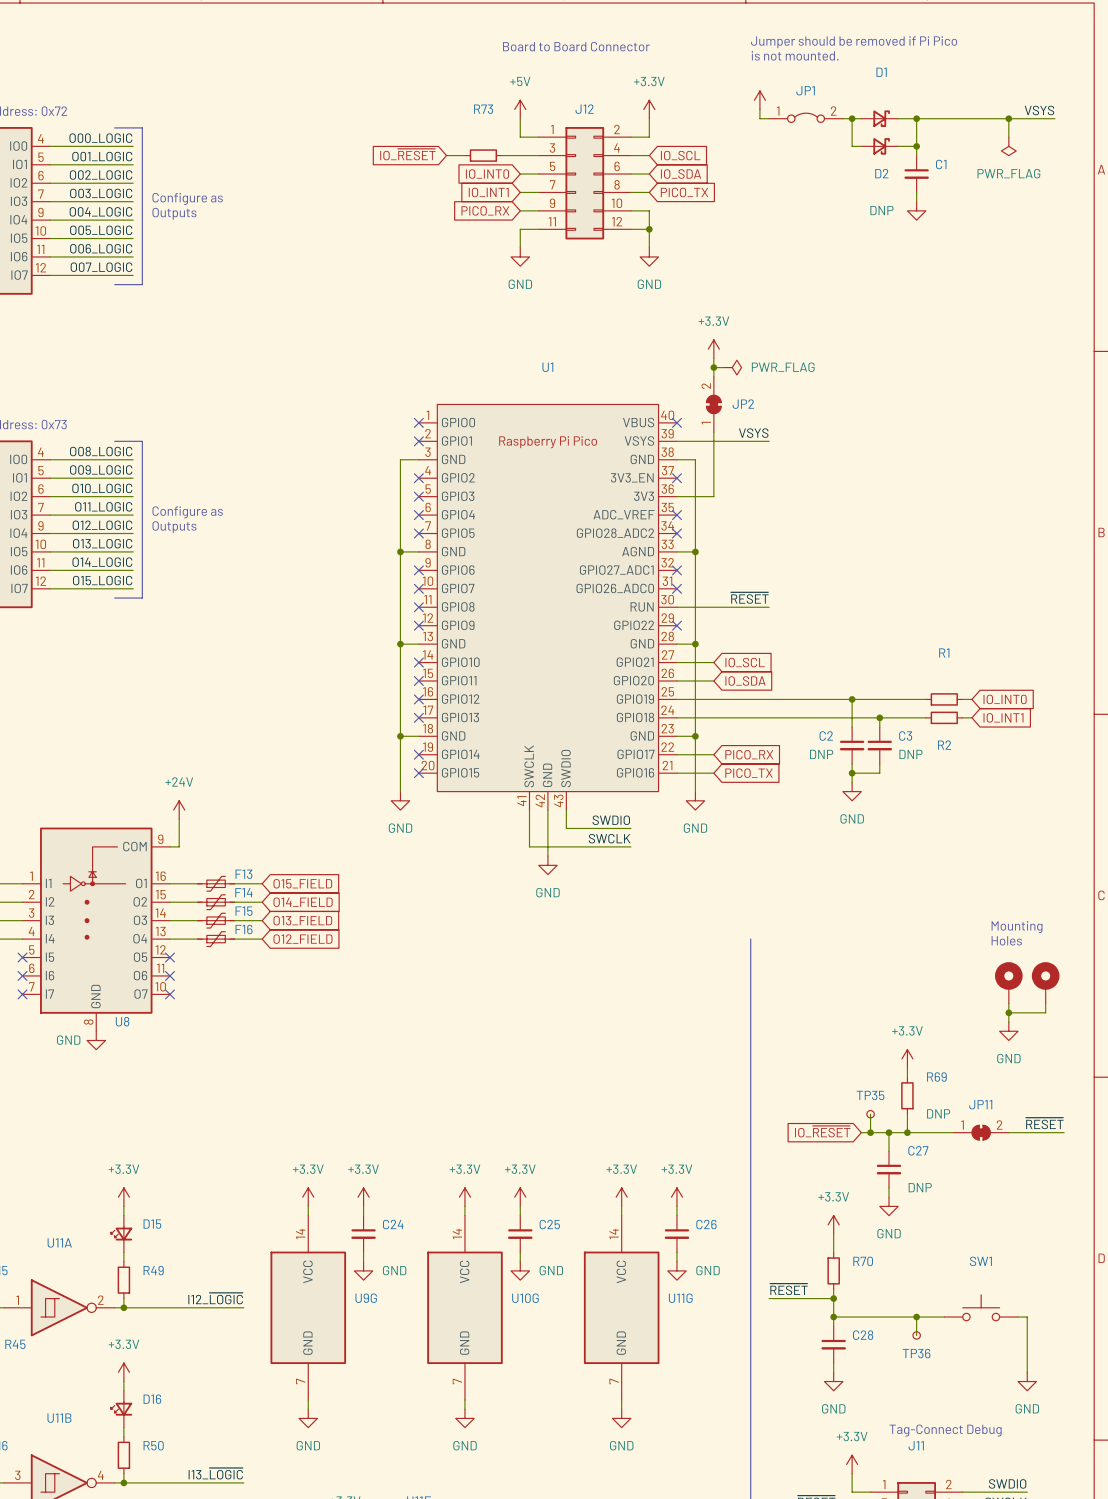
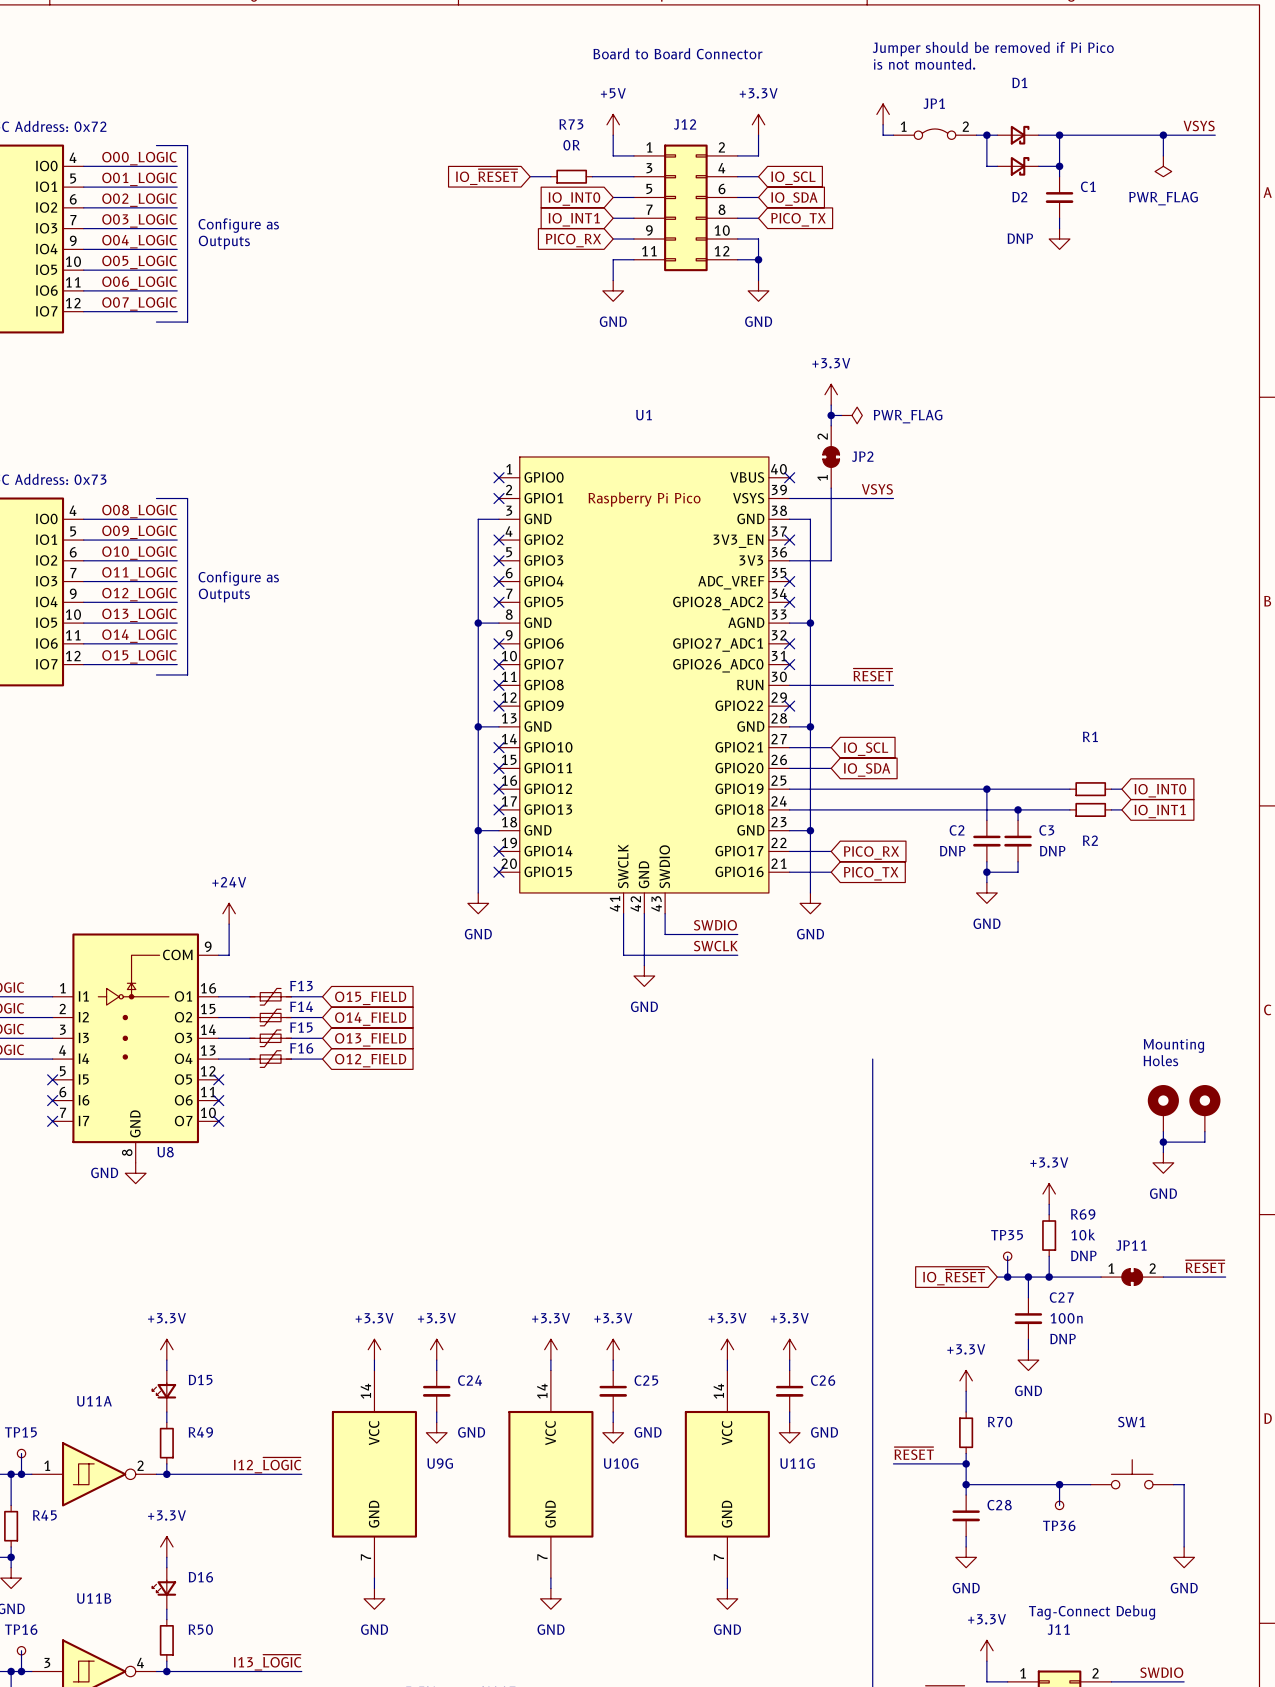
R73 value: none -> 0R (571, 145)
R69 value: none -> 10k (1083, 1234)
C27 value: none -> 100n (1066, 1318)

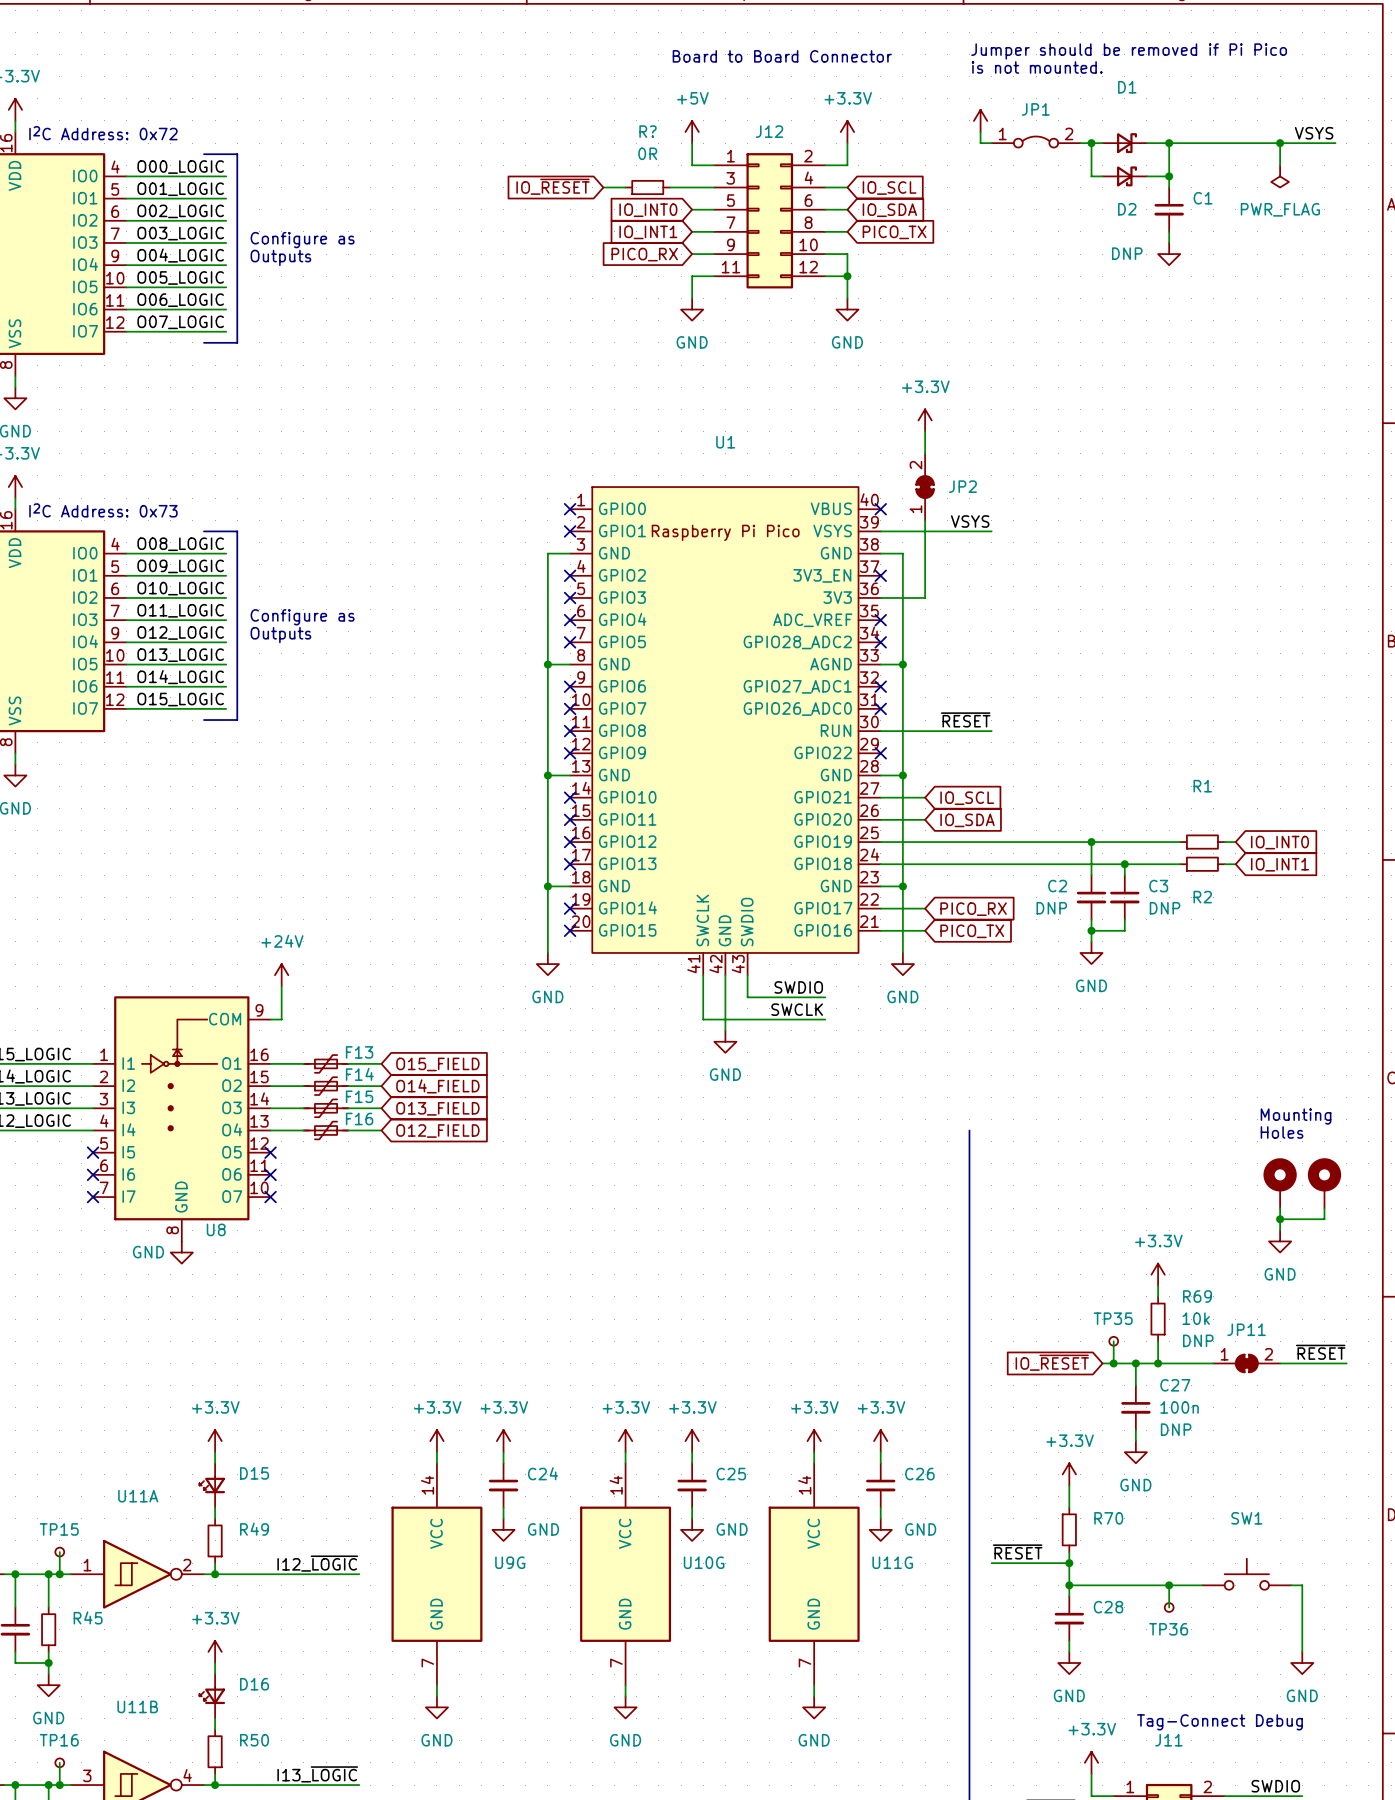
R73 name: R73 (571, 124) -> R? (648, 131)
wire: (831, 415) (841, 415) -> none
junction: (831, 415) -> none
power symbol: PWR_FLAG (851, 415) -> none

